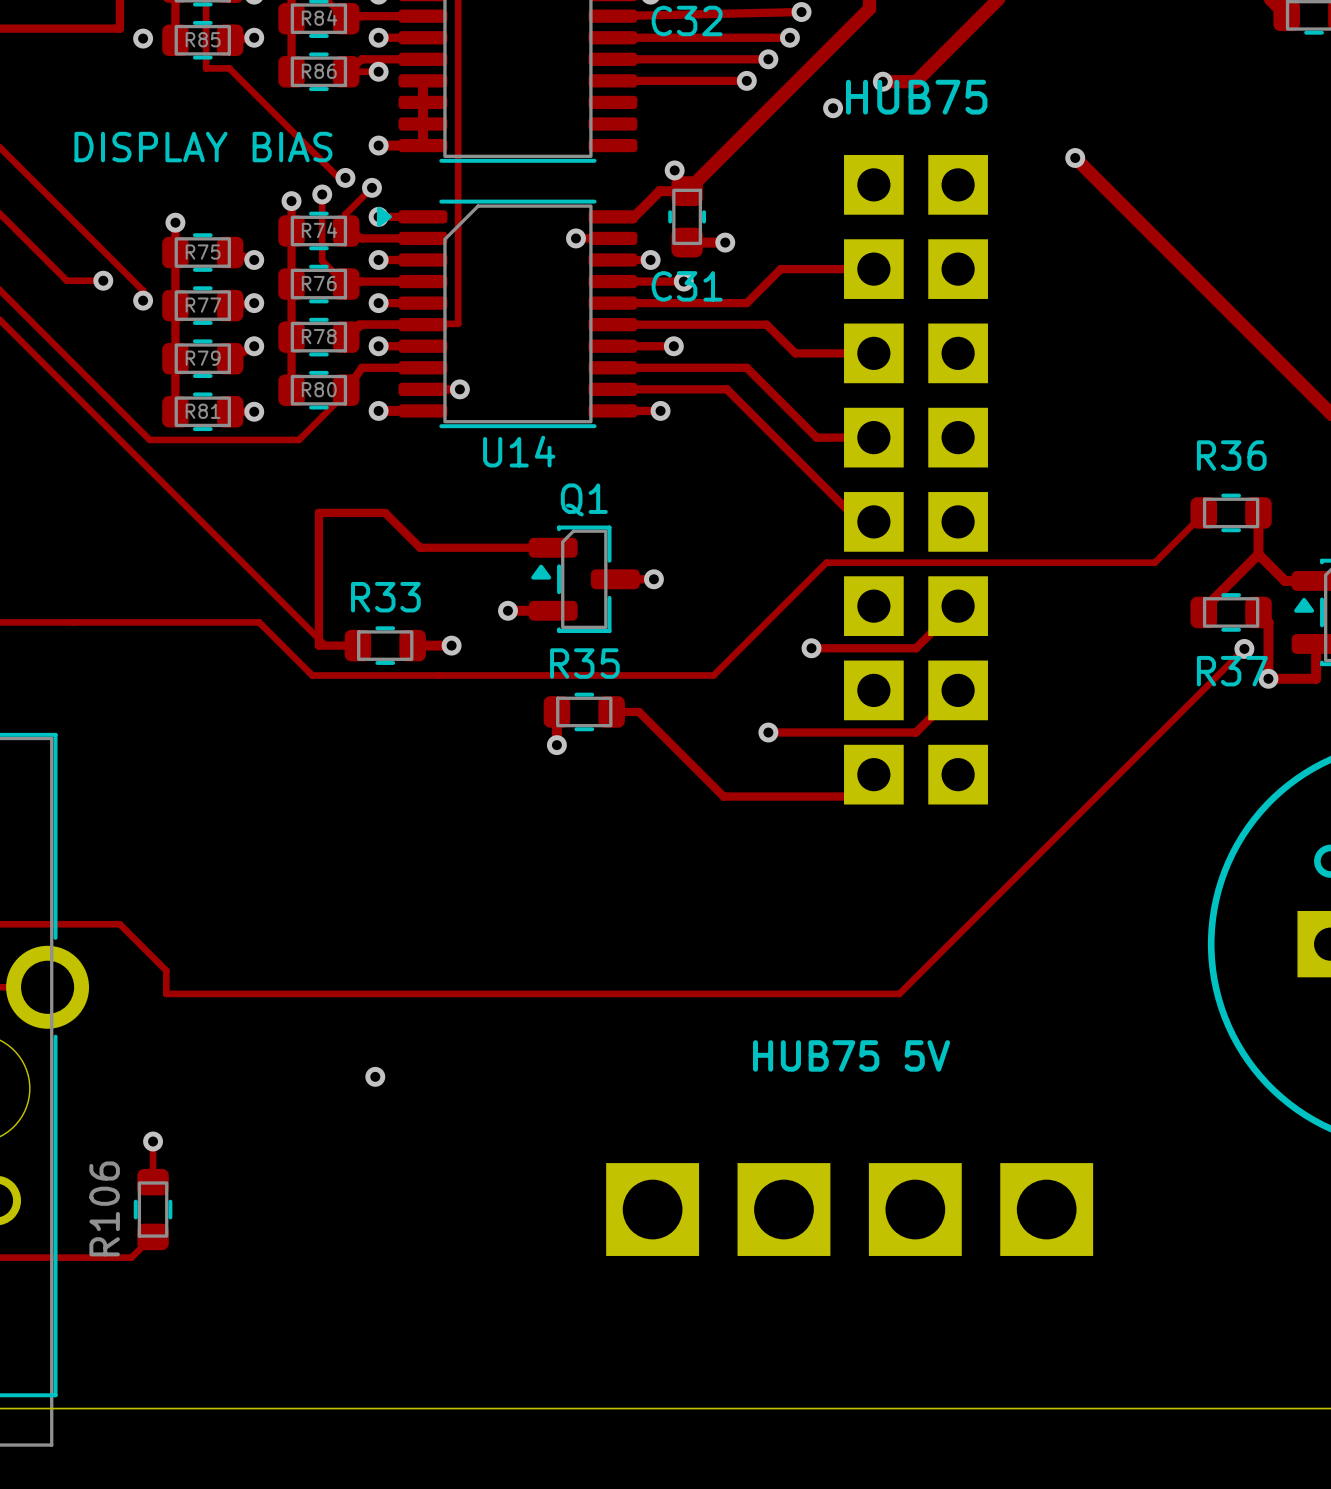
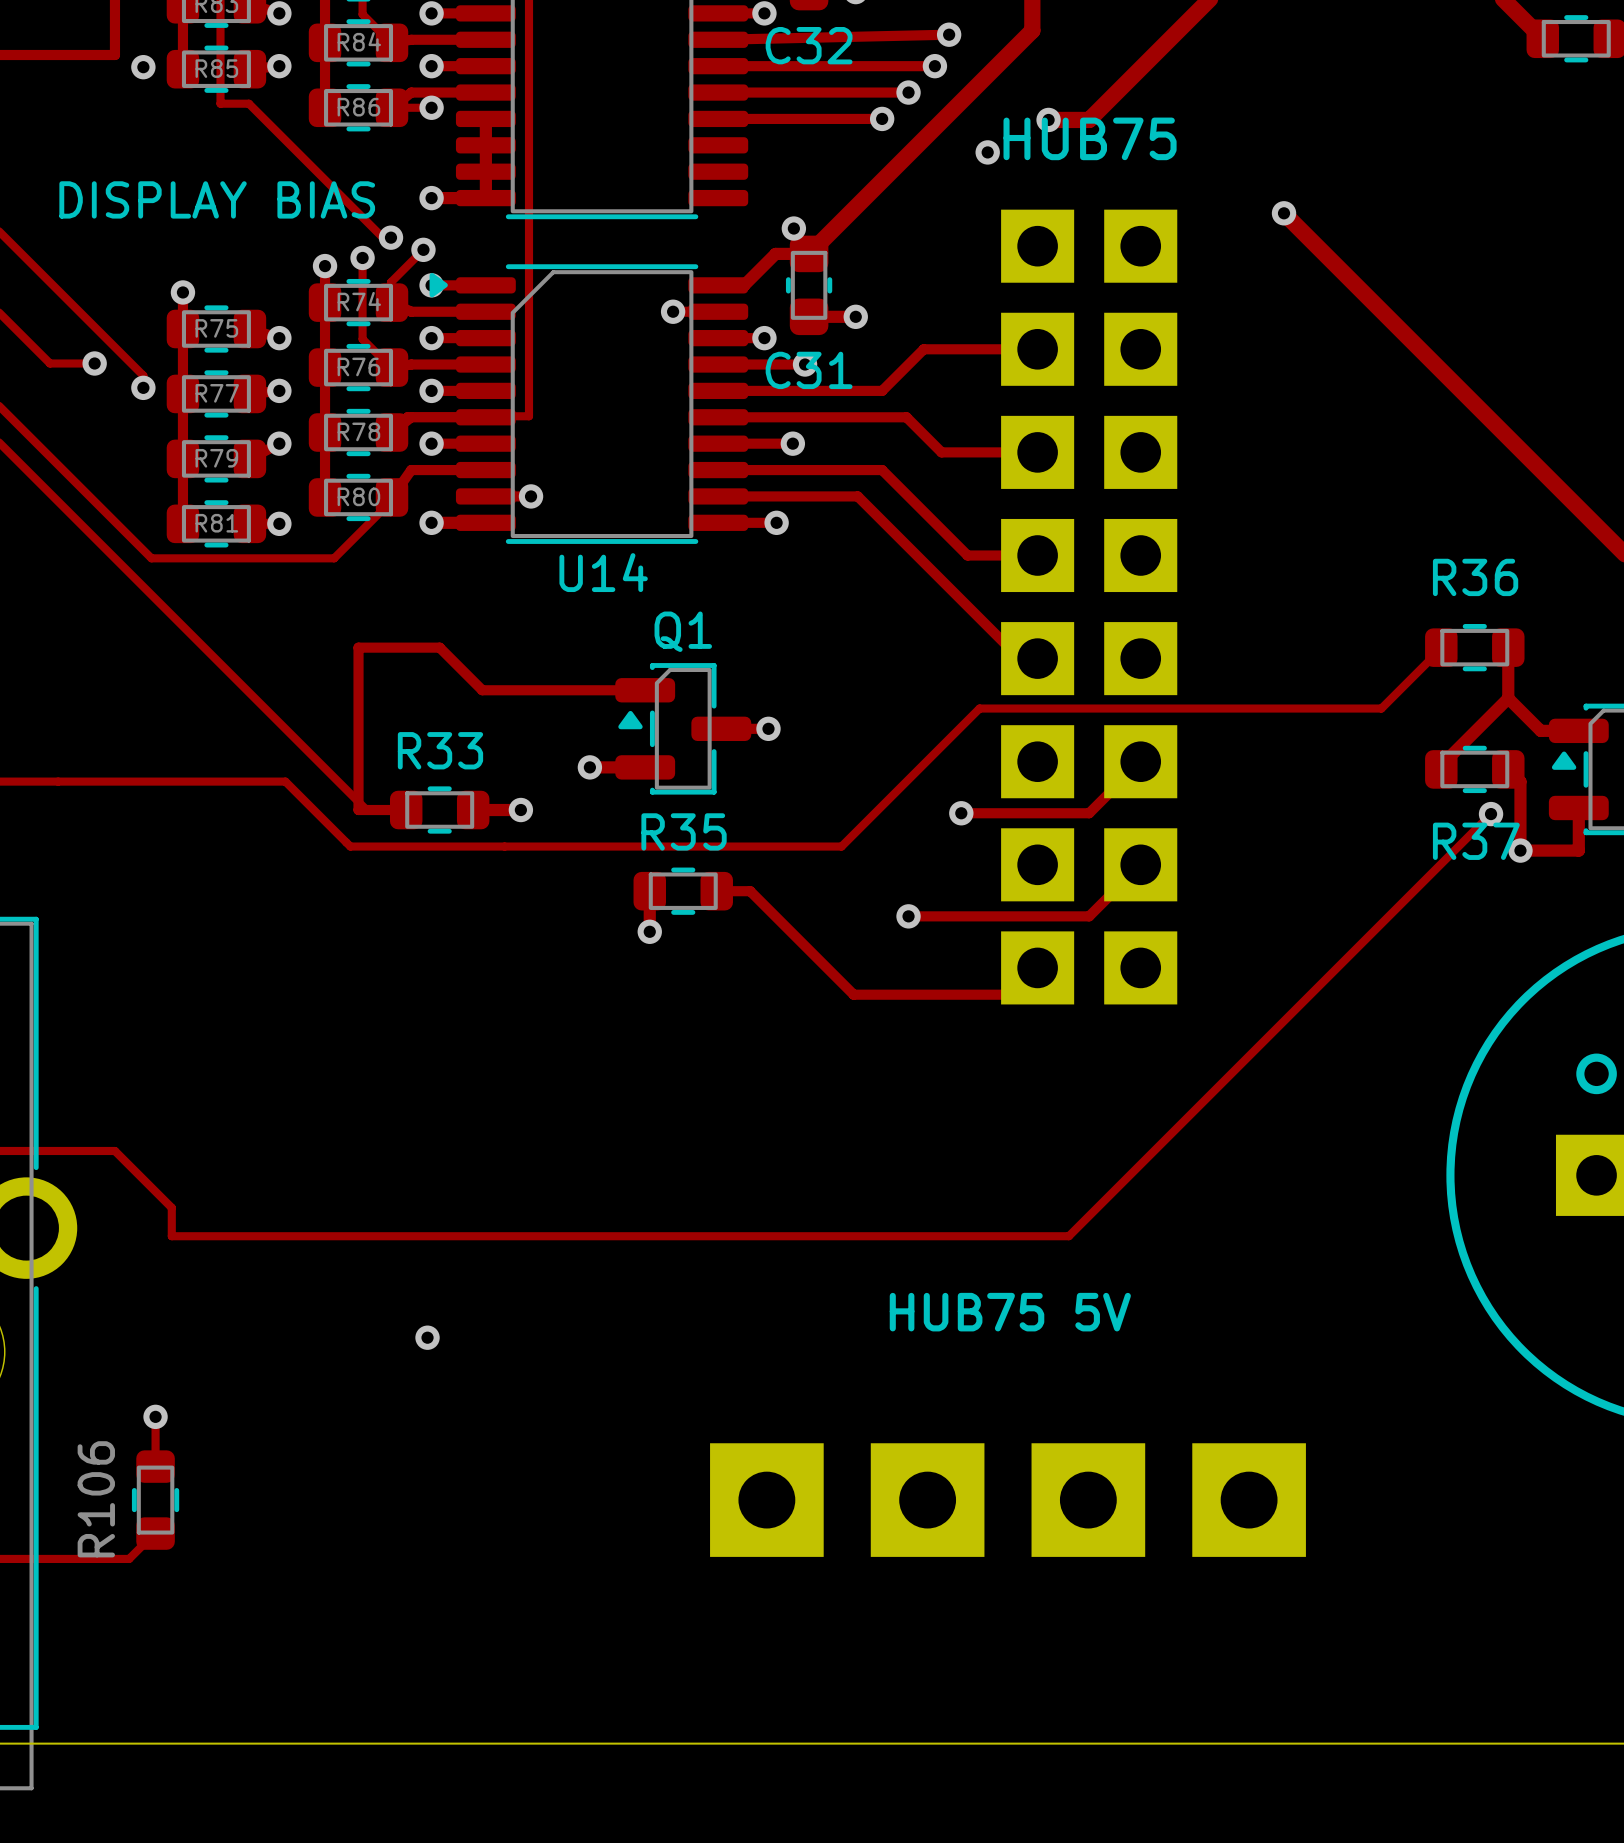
part footprint: [606, 1163, 1094, 1256] -> [710, 1443, 1306, 1557]

